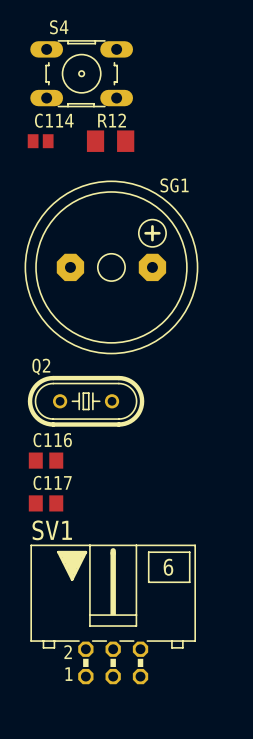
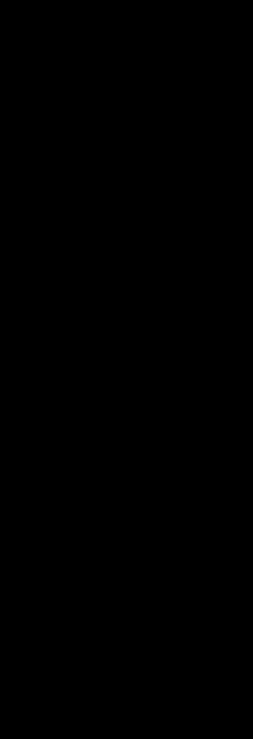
S4: (81, 73) -> none
C114: (40, 141) -> none
R12: (110, 141) -> none
SG1: (111, 267) -> none
Q2: (86, 401) -> none
C116: (46, 460) -> none
C117: (46, 503) -> none
SV1: (113, 614) -> none

